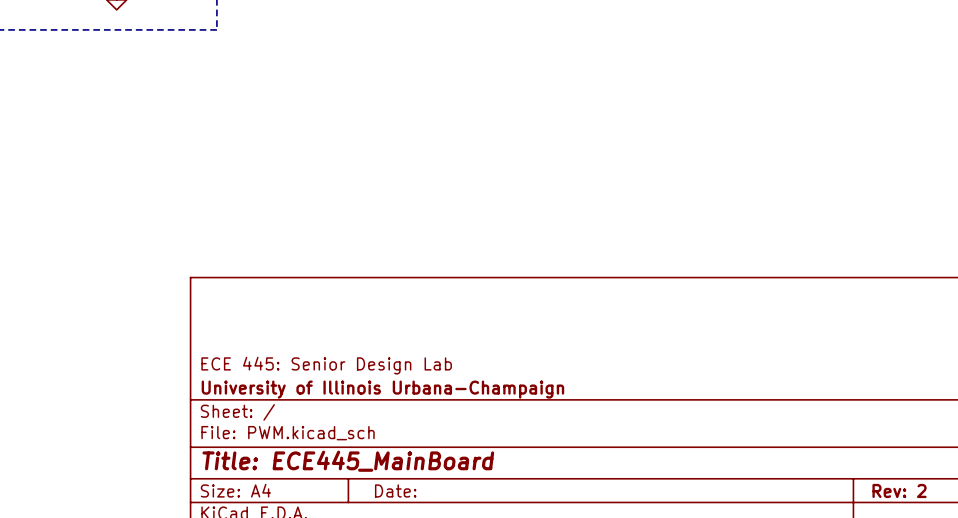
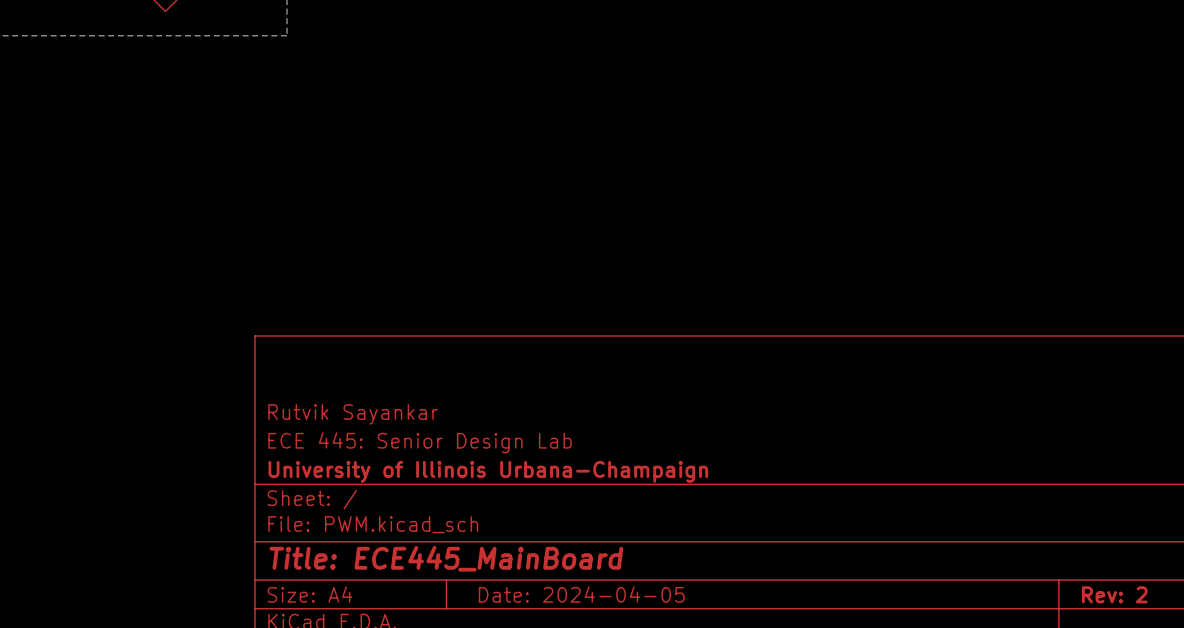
title block: none -> Rutvik Sayankar (353, 414)
title block: Date: (395, 490) -> Date: 2024-04-05 (581, 594)

